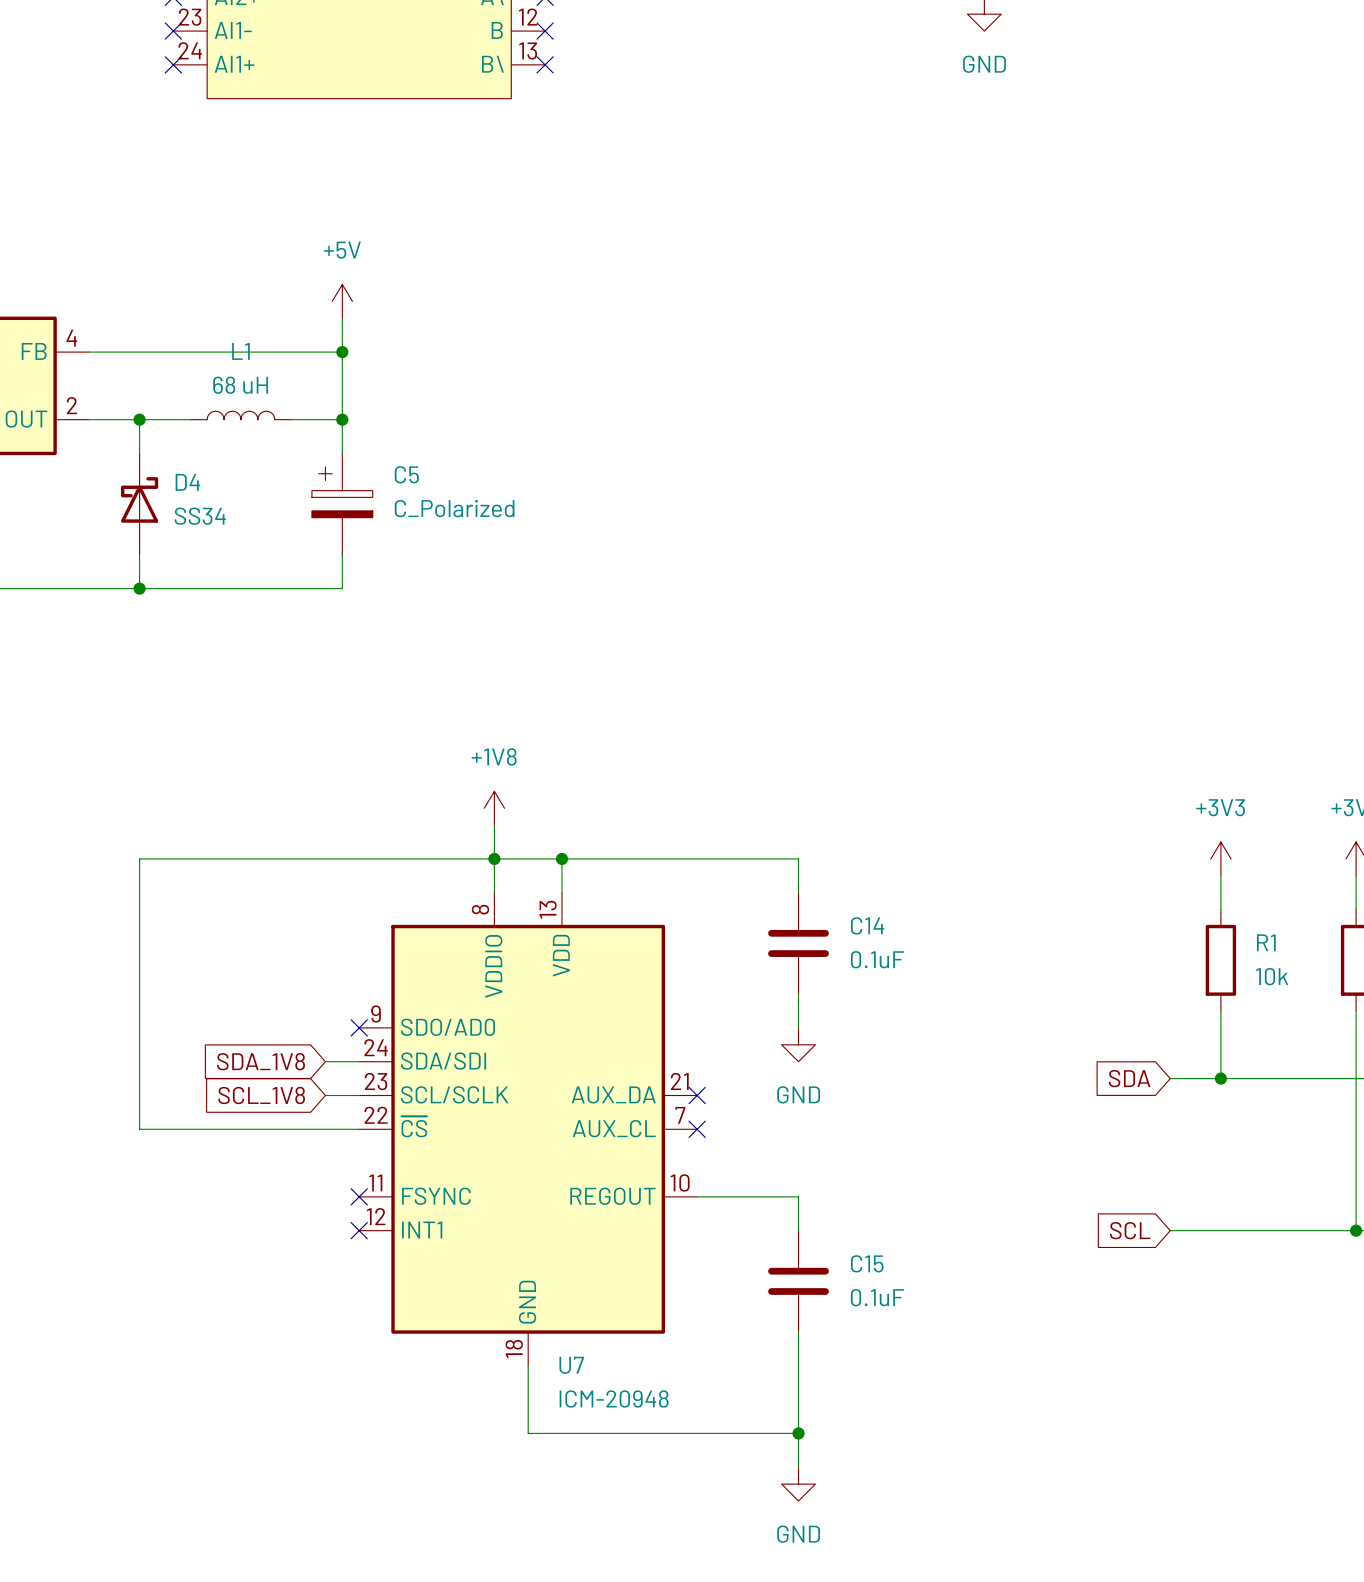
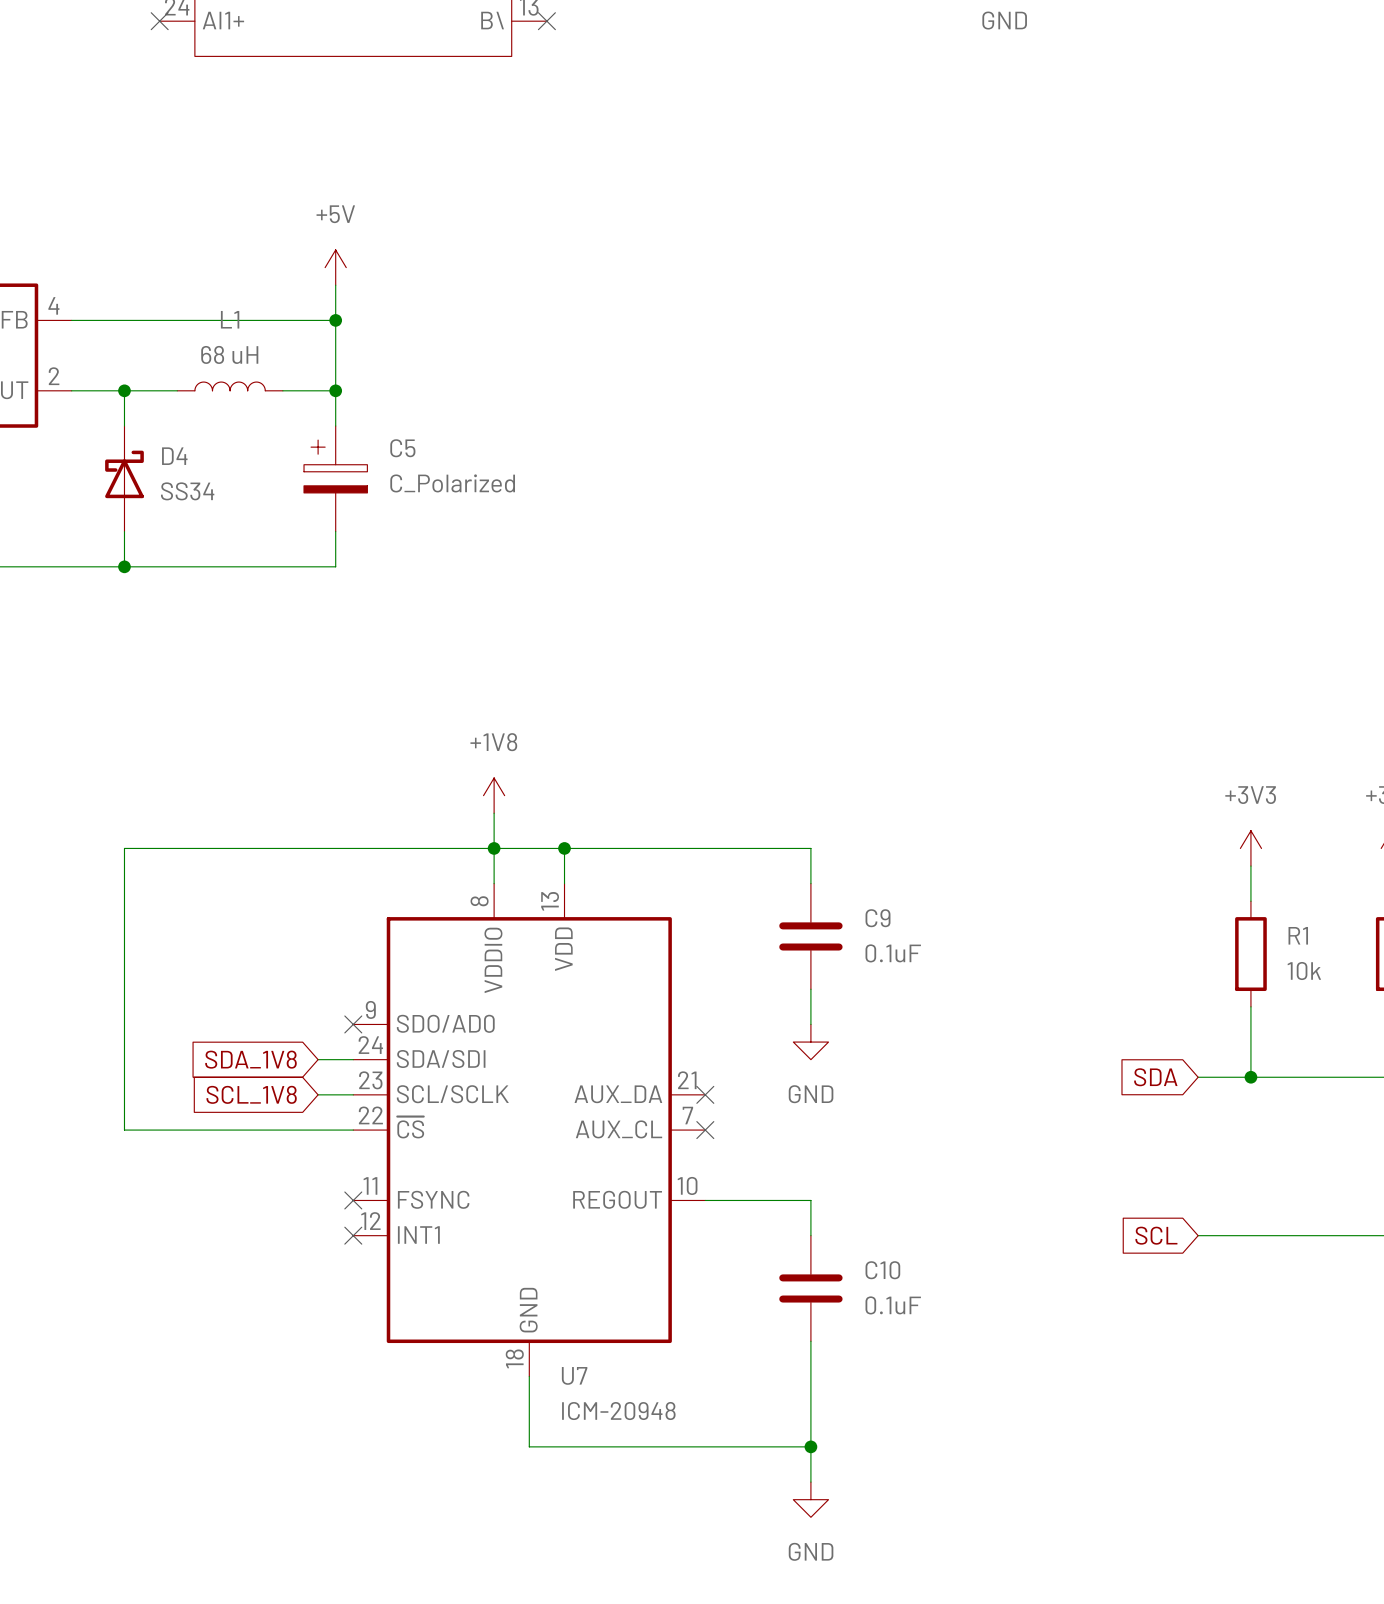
C14 name: C14 (867, 925) -> C9 (878, 918)
C15 name: C15 (867, 1263) -> C10 (882, 1270)

